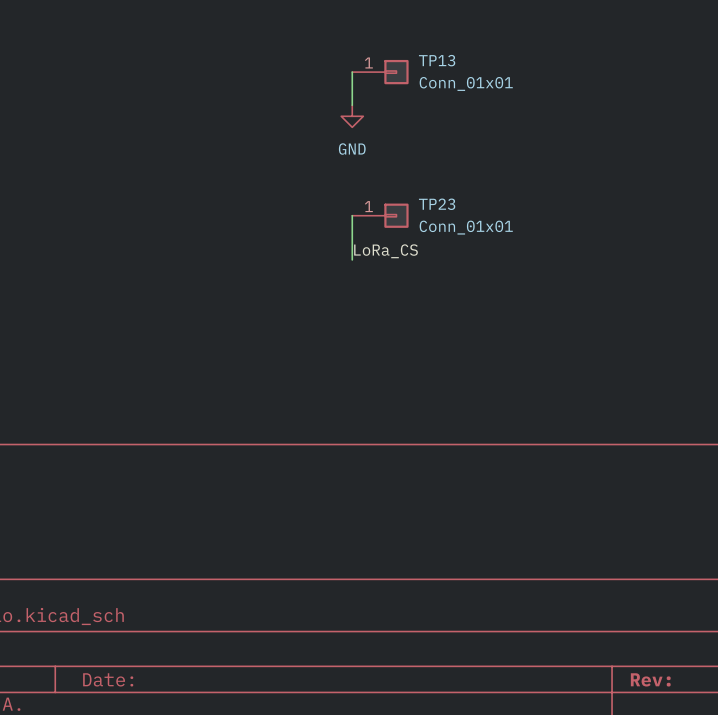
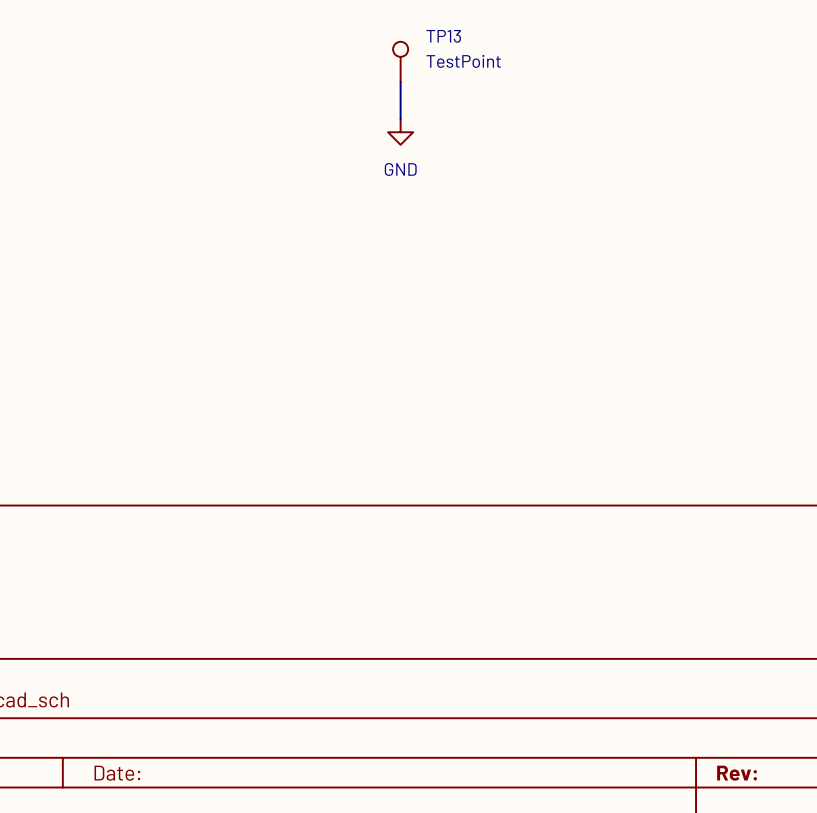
TP13 symbol: [352, 59, 409, 85] -> [393, 41, 409, 82]
TP13 name position: TP13 (437, 60) -> TP13 (443, 36)
TP13 value: Conn_01x01 (466, 83) -> TestPoint (463, 61)
wire: (352, 215) (352, 259) -> none
TP23: Conn_01x01 (380, 215) -> none
label: LoRa_CS (386, 251) -> none

